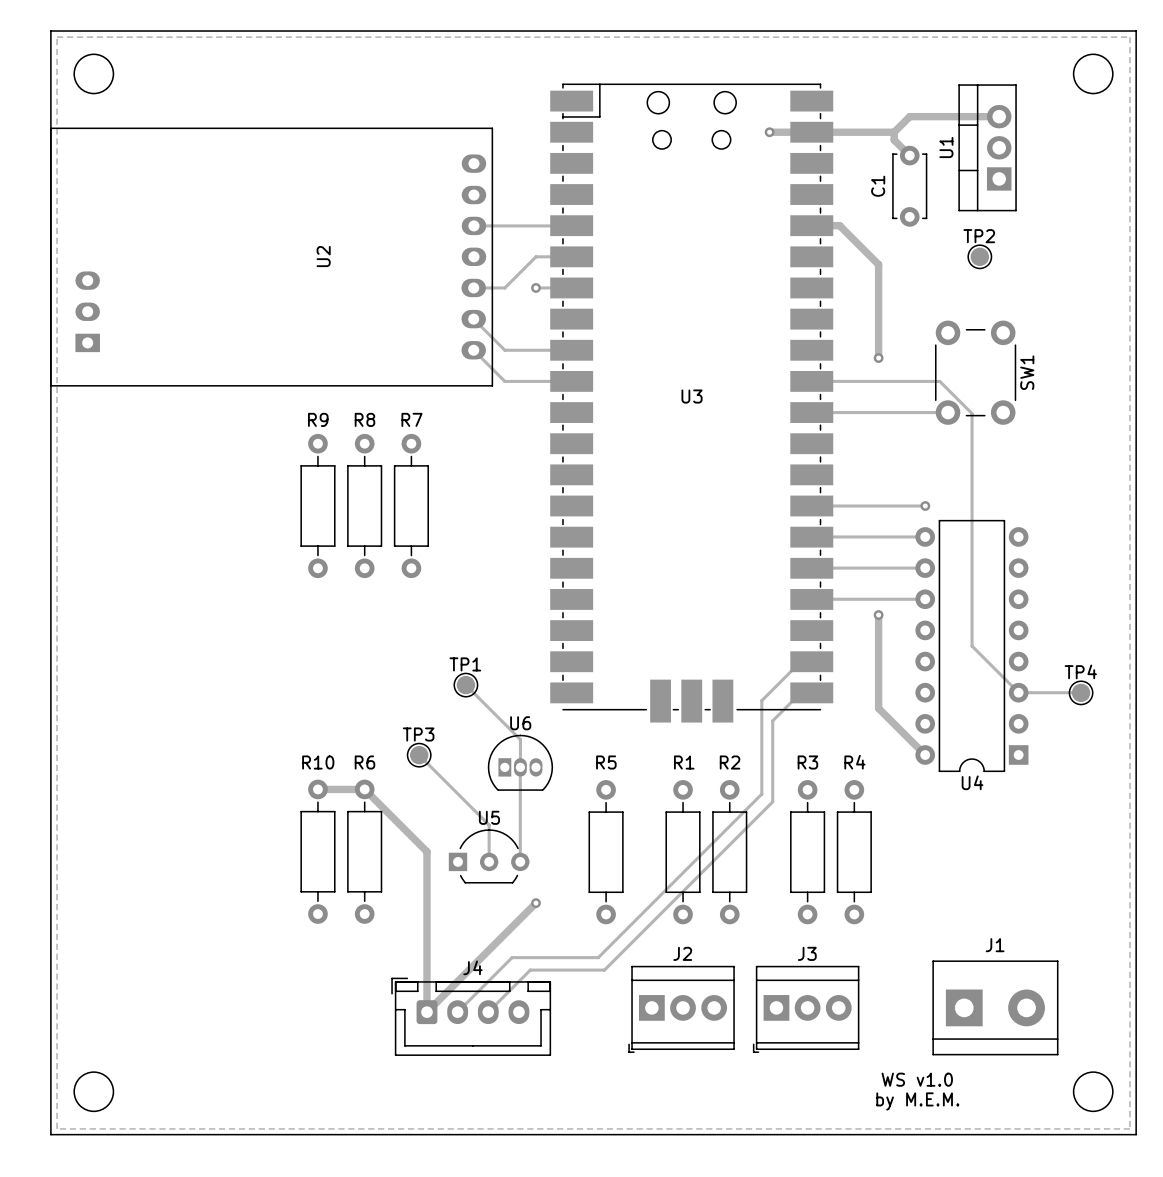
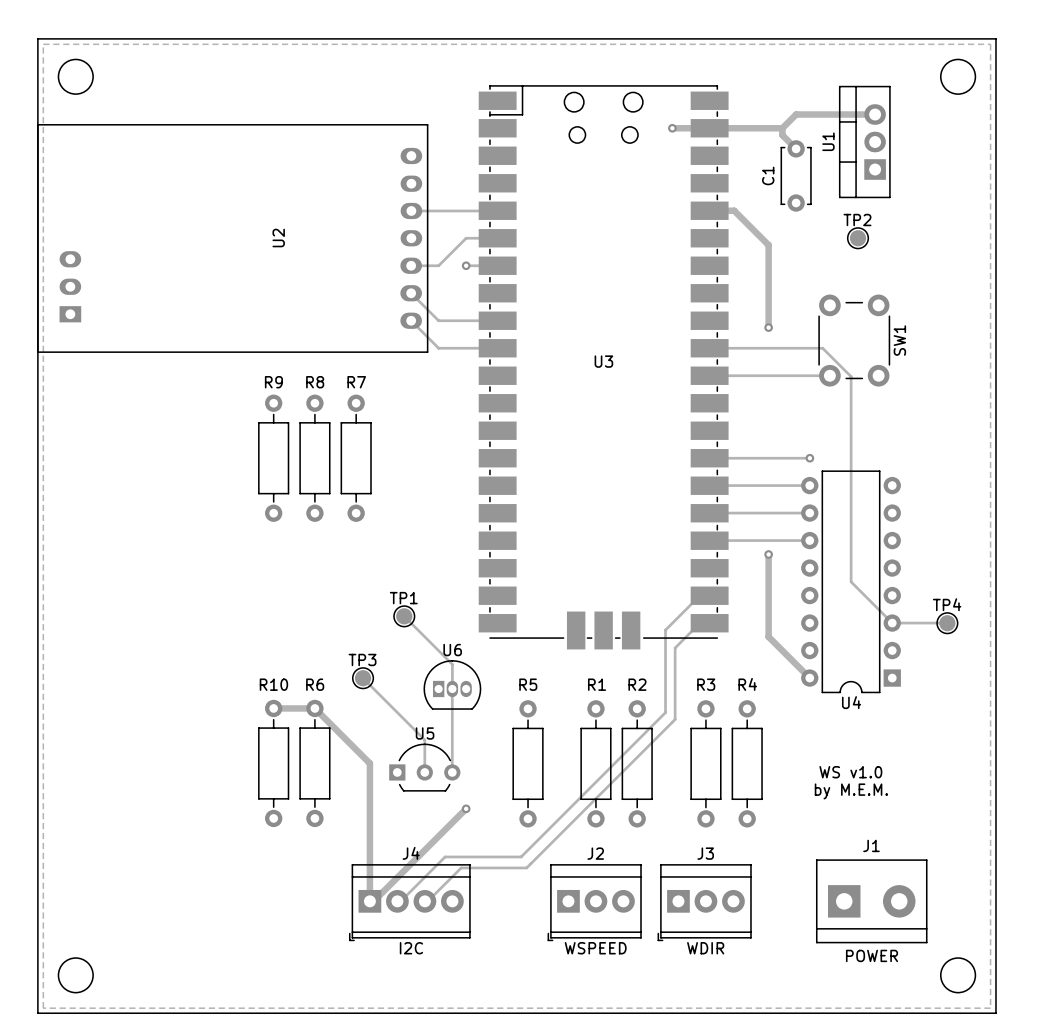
J4 footprint: [391, 977, 552, 1056] -> [349, 864, 471, 942]
J4 value: none -> I2C (411, 948)
J2 value: none -> WSPEED (595, 948)
J3 value: none -> WDIR (705, 948)
J1 value: none -> POWER (872, 955)
text position: WS v1.0 (917, 1079) -> WS v1.0 (850, 772)
text position: by M.E.M. (917, 1101) -> by M.E.M. (851, 791)

